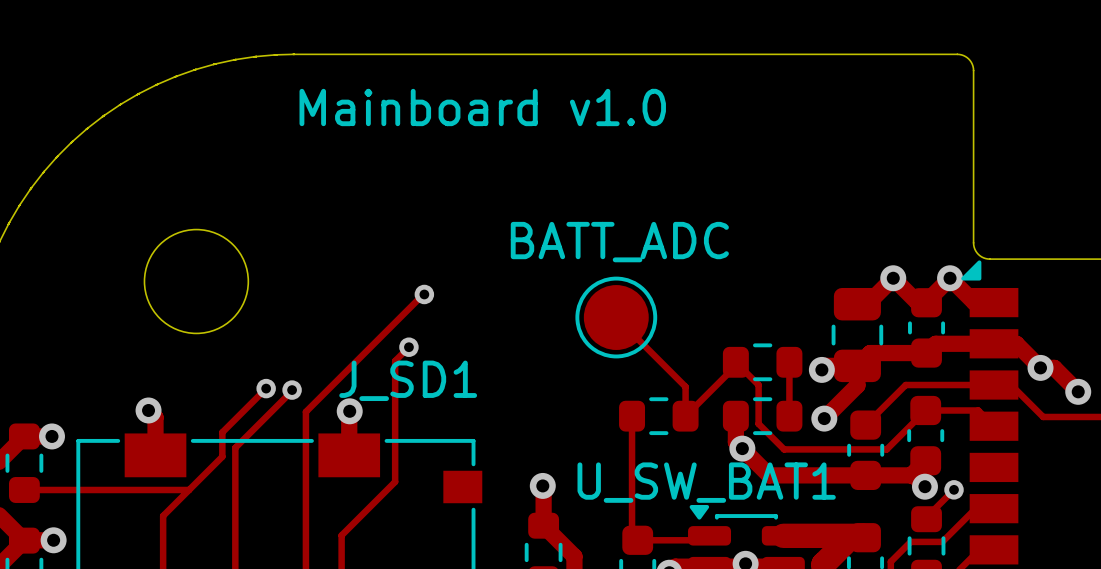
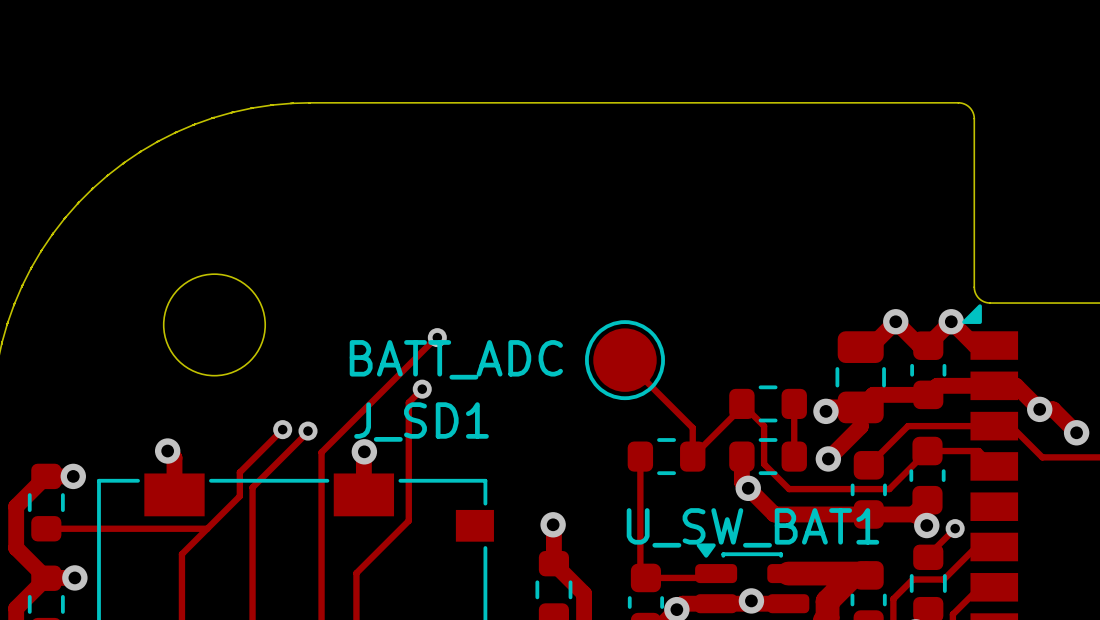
text: Mainboard v1.0 (482, 107) -> none
part value position: BATT_ADC (619, 242) -> BATT_ADC (456, 359)
U_SW_BAT1 name position: U_SW_BAT1 (706, 482) -> U_SW_BAT1 (752, 527)

